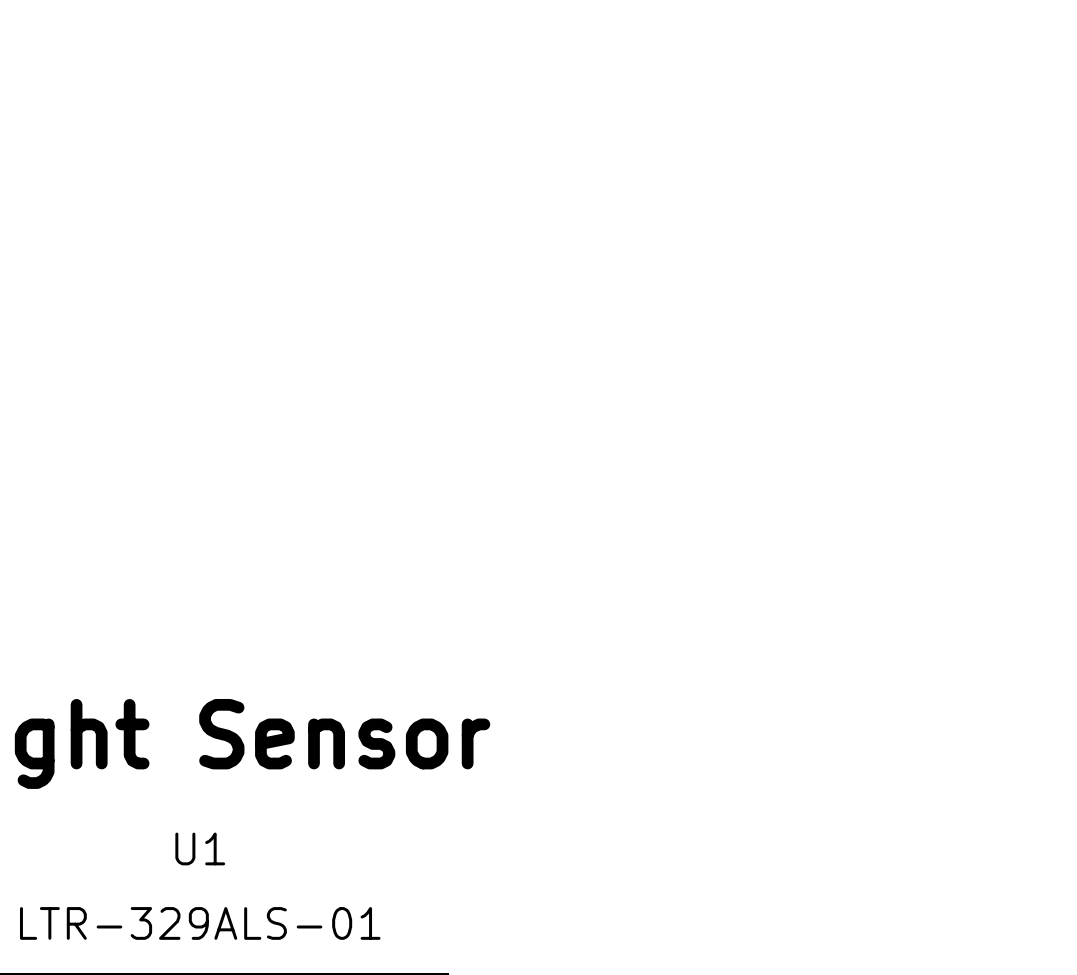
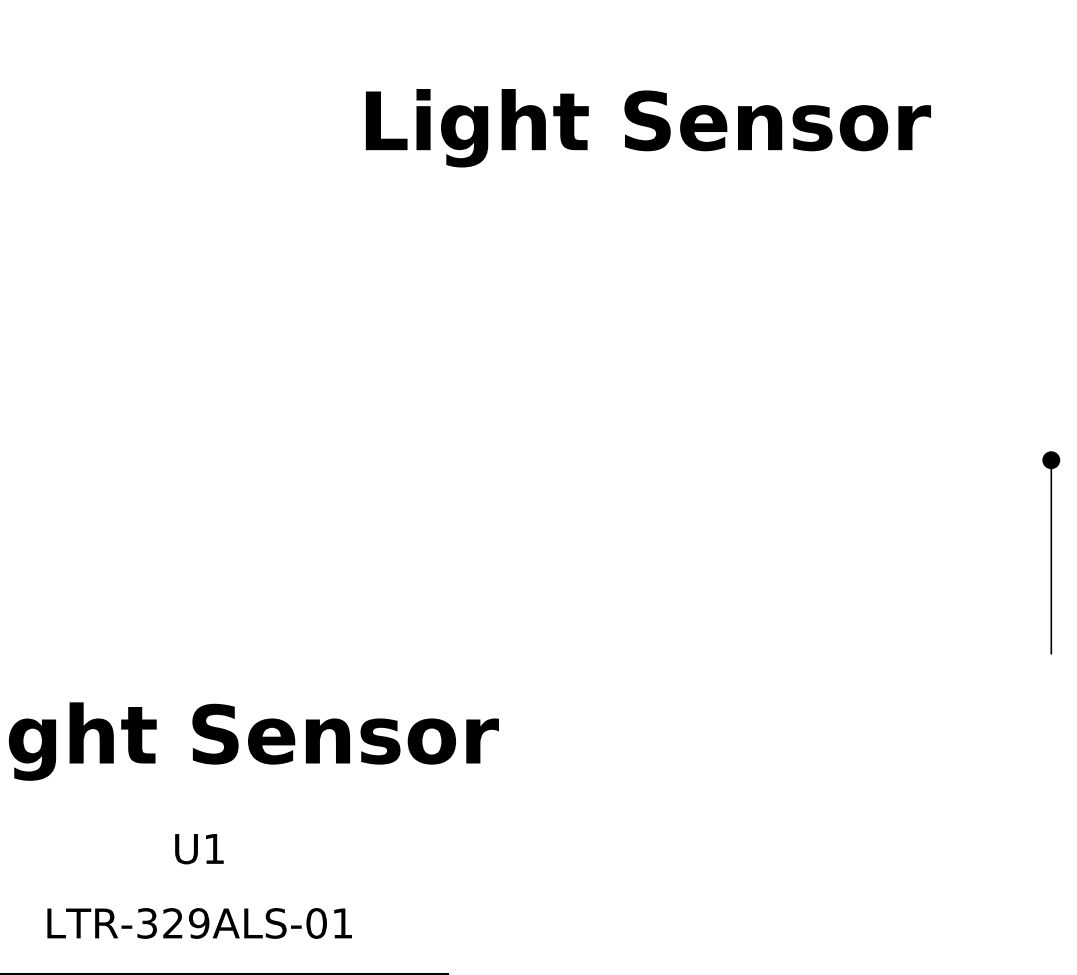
text: none -> Light Sensor (648, 128)
wire: none -> (1051, 460) (1051, 653)
junction: none -> (1051, 460)

